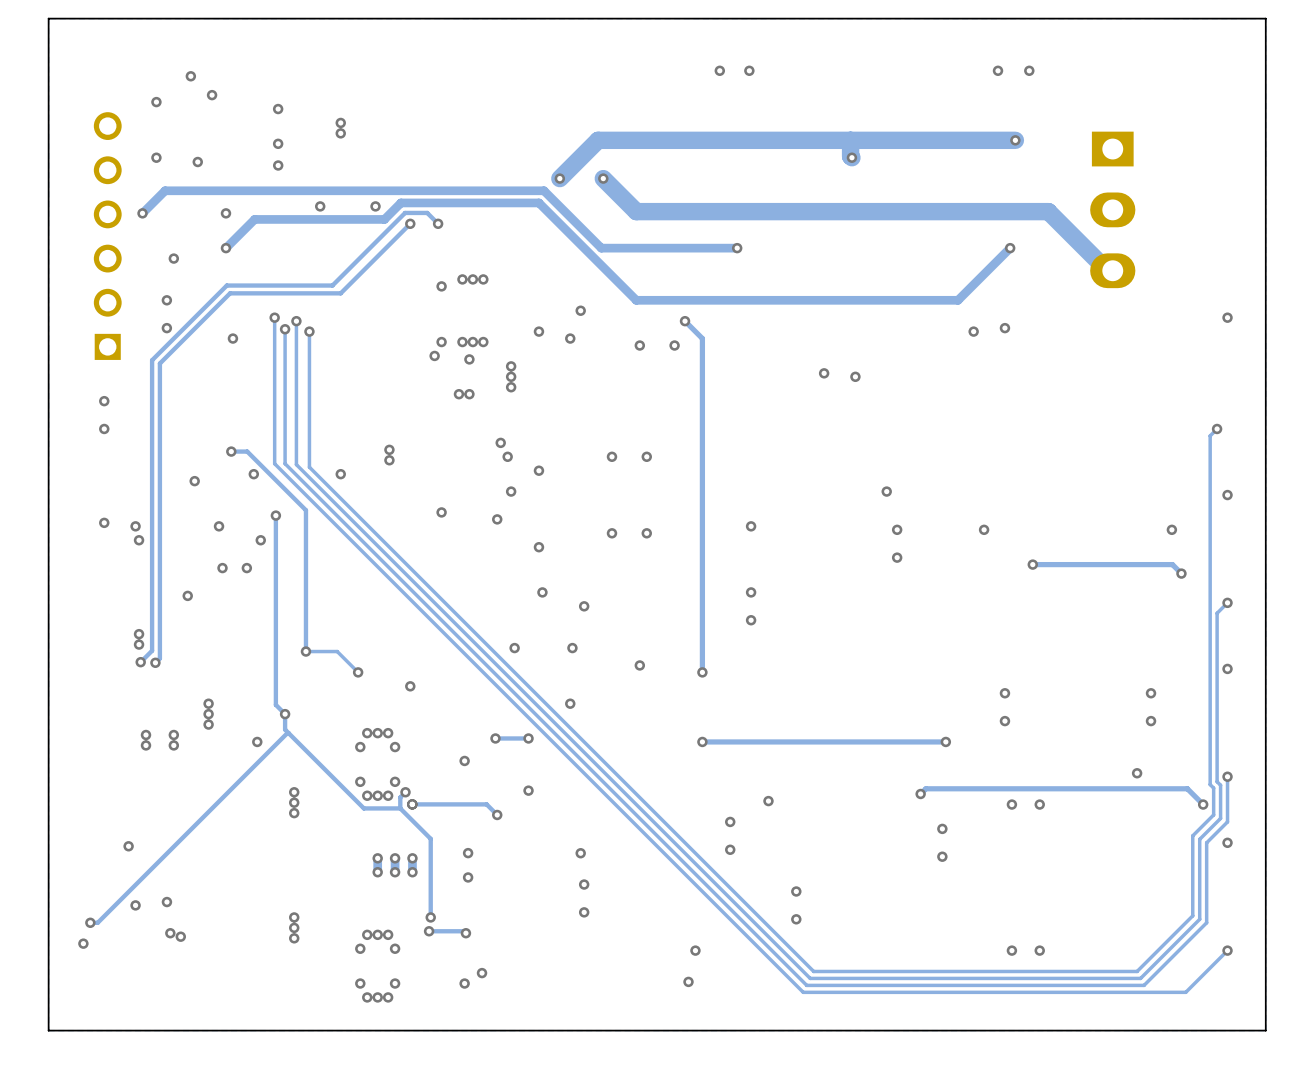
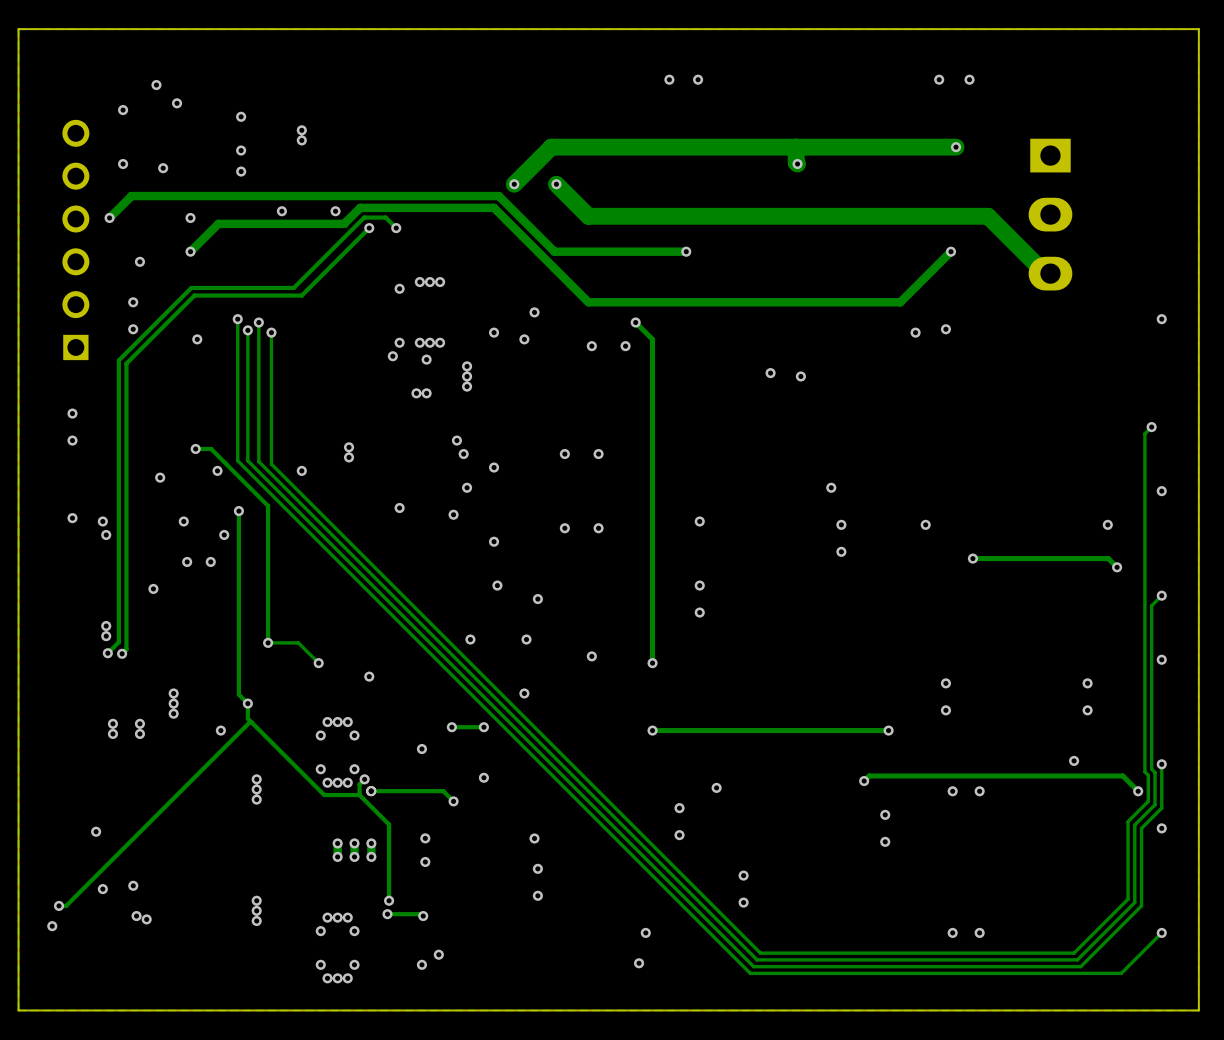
via: (104, 401) -> none
via: none -> (72, 413)
via: (104, 428) -> none
via: none -> (72, 440)

